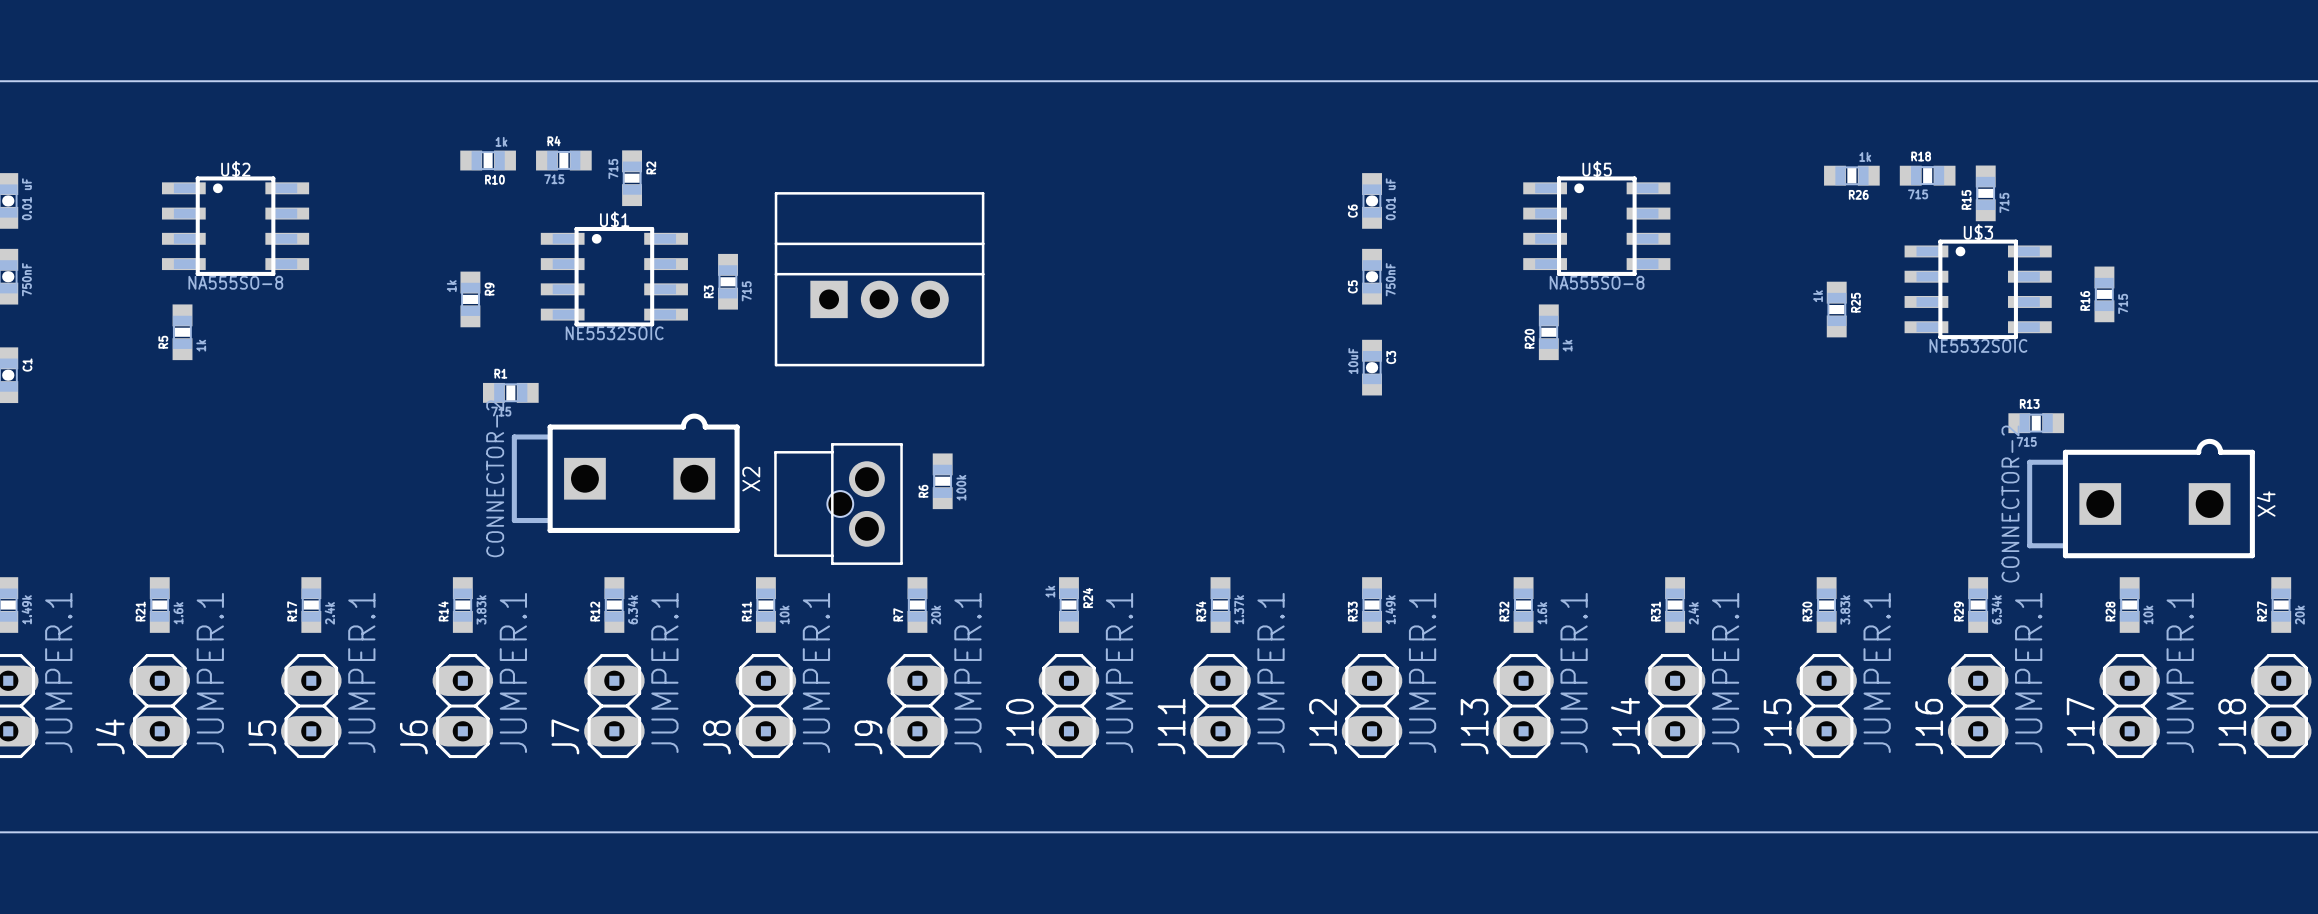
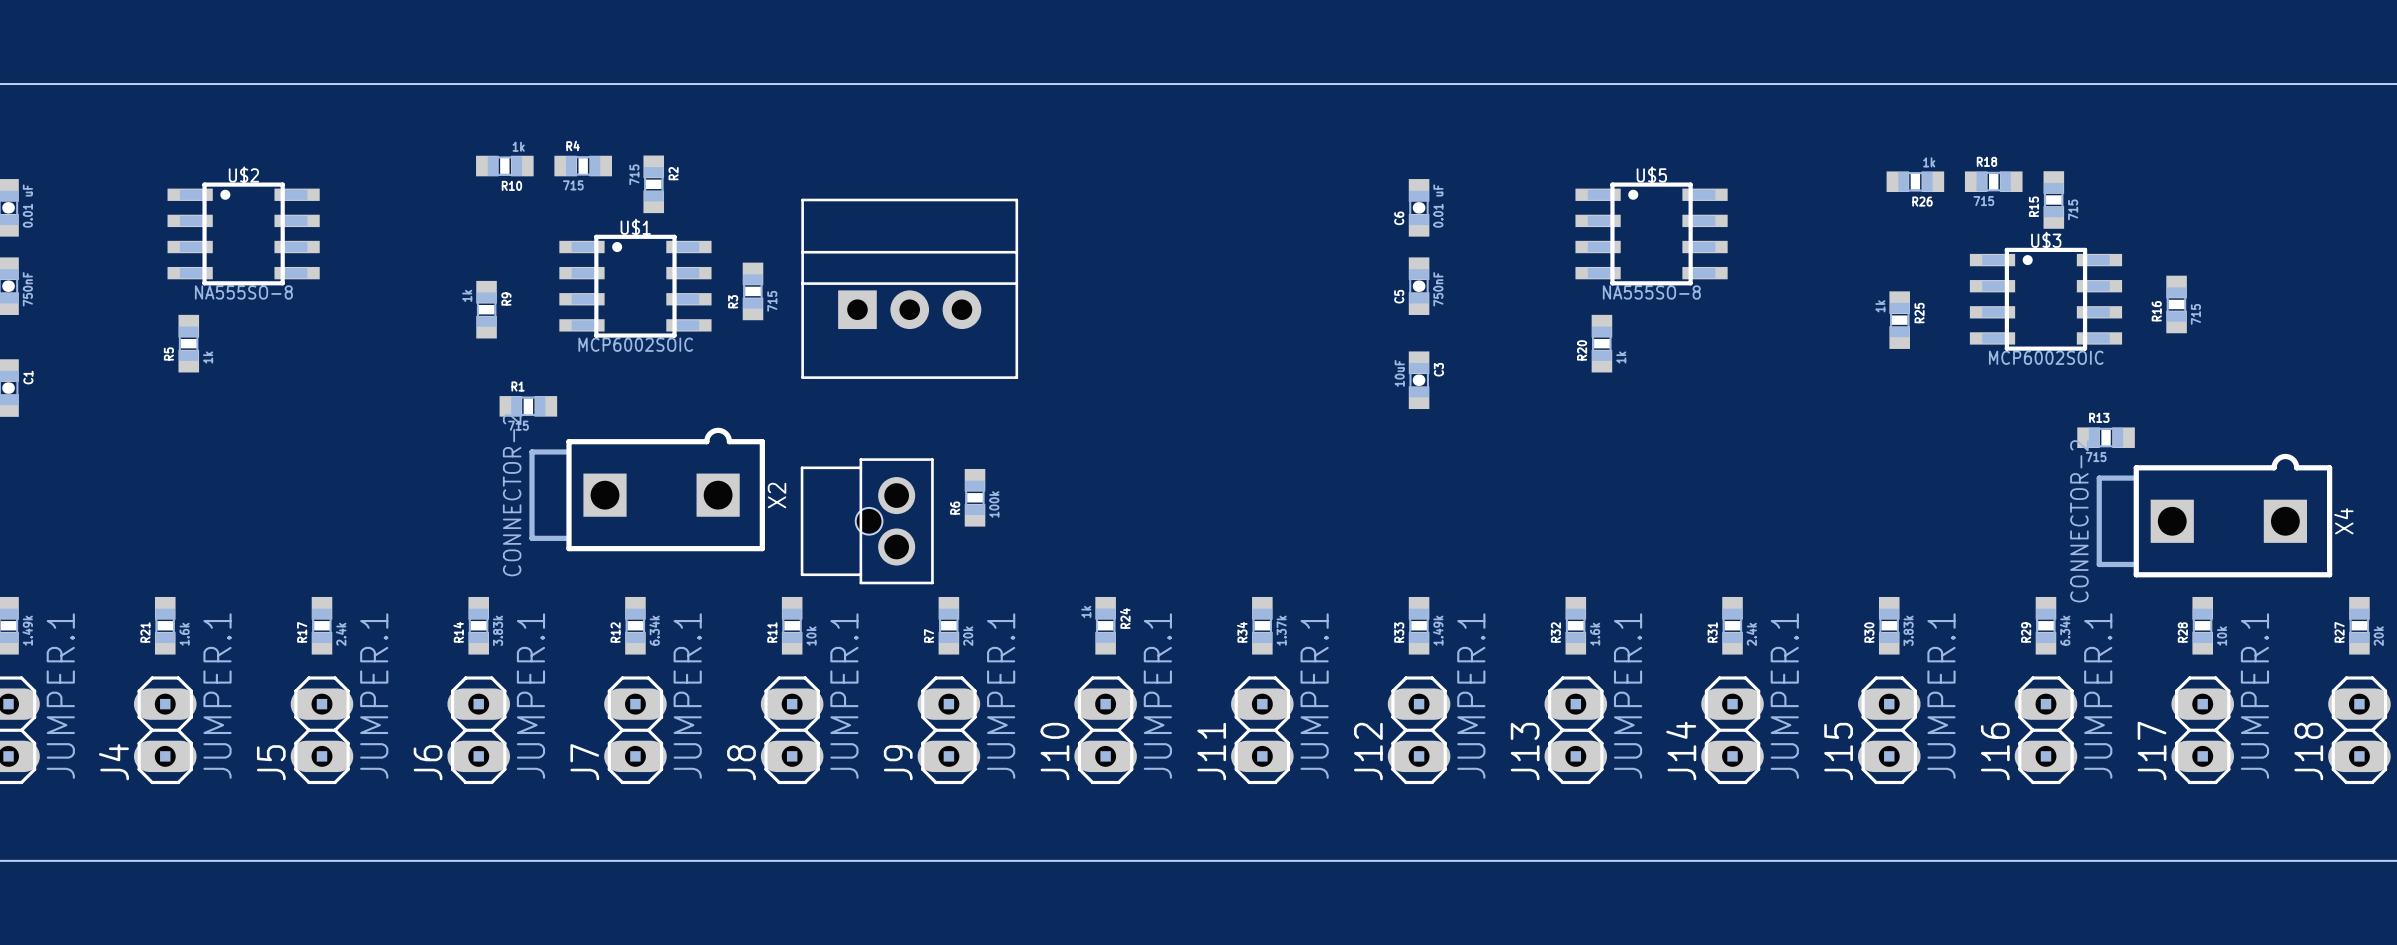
U$1 value: NE5532SOIC (614, 333) -> MCP6002SOIC (635, 344)
U$3 value: NE5532SOIC (1978, 345) -> MCP6002SOIC (2046, 357)

